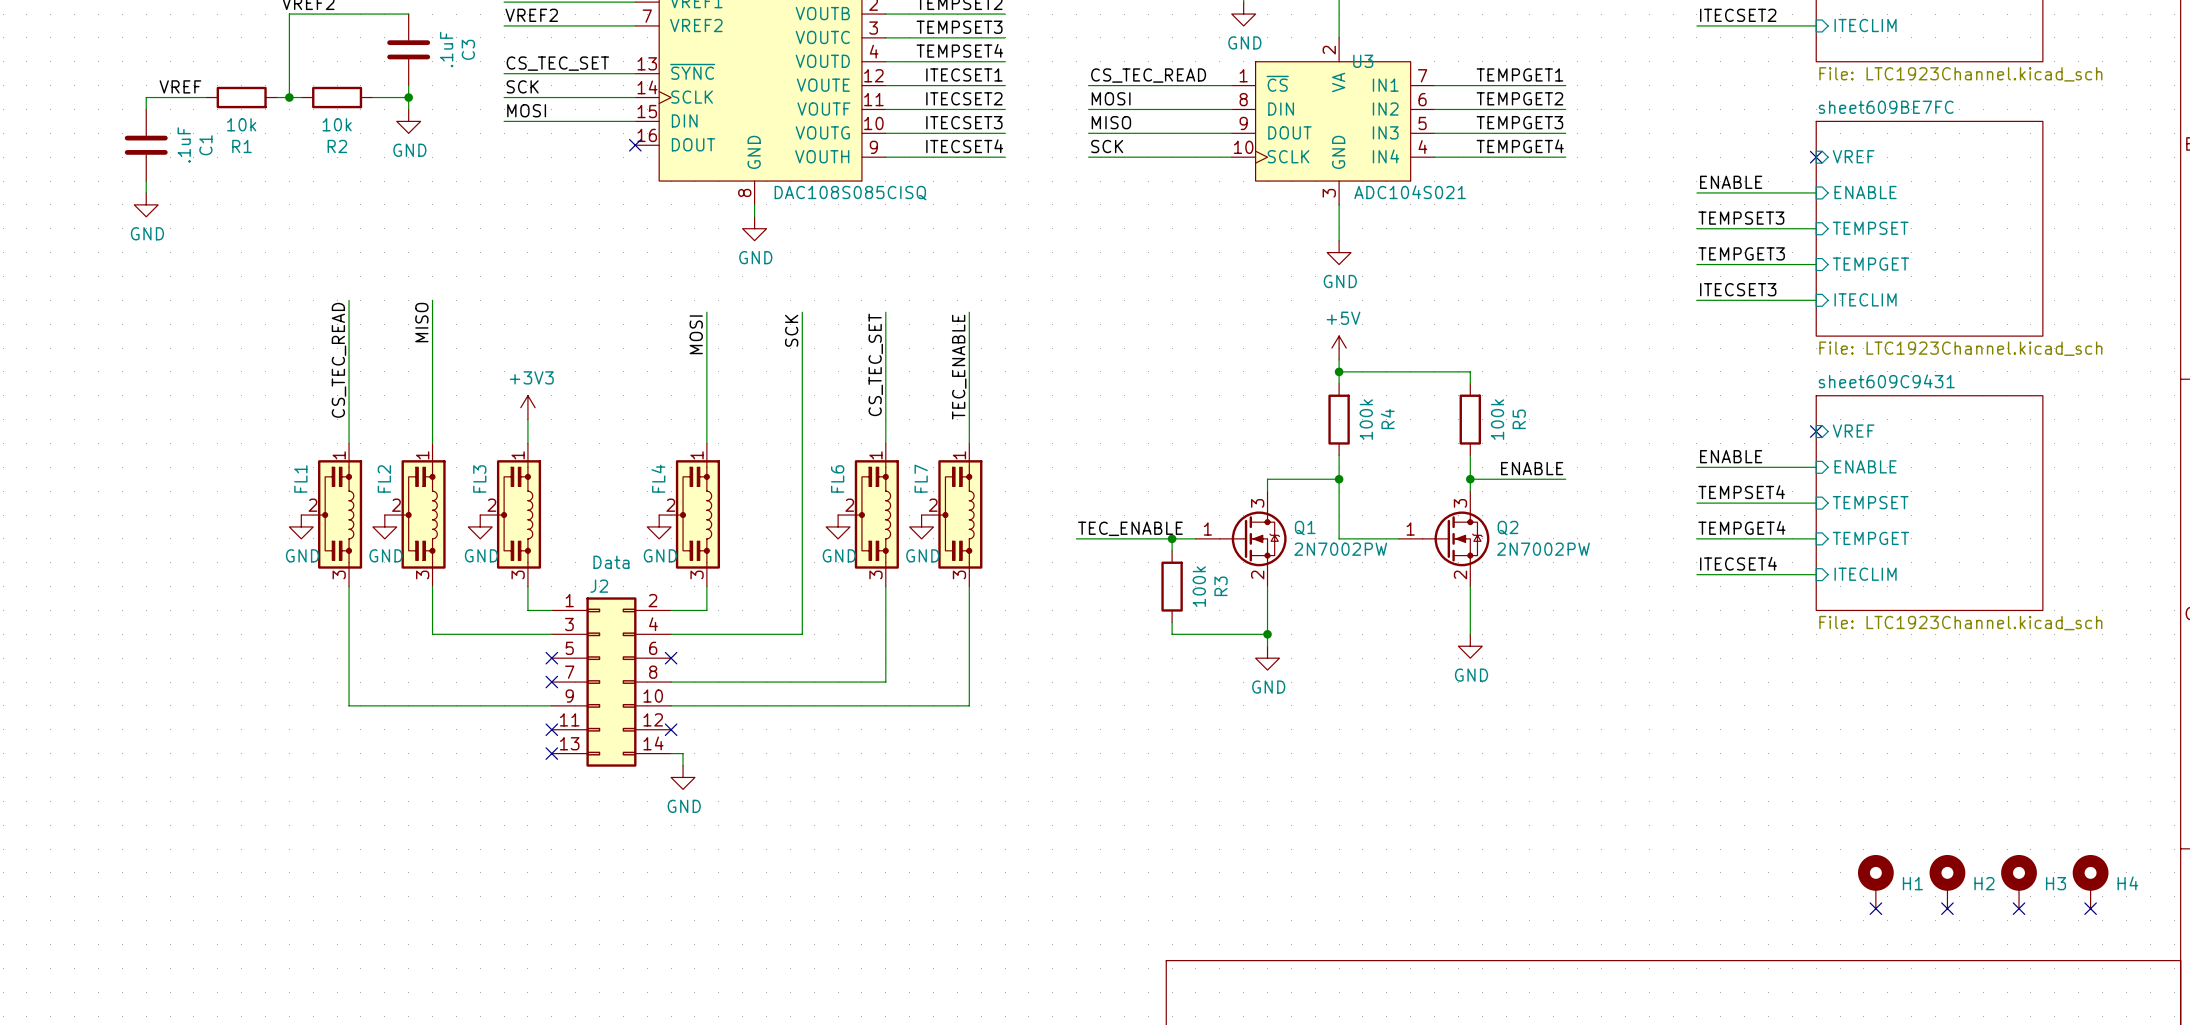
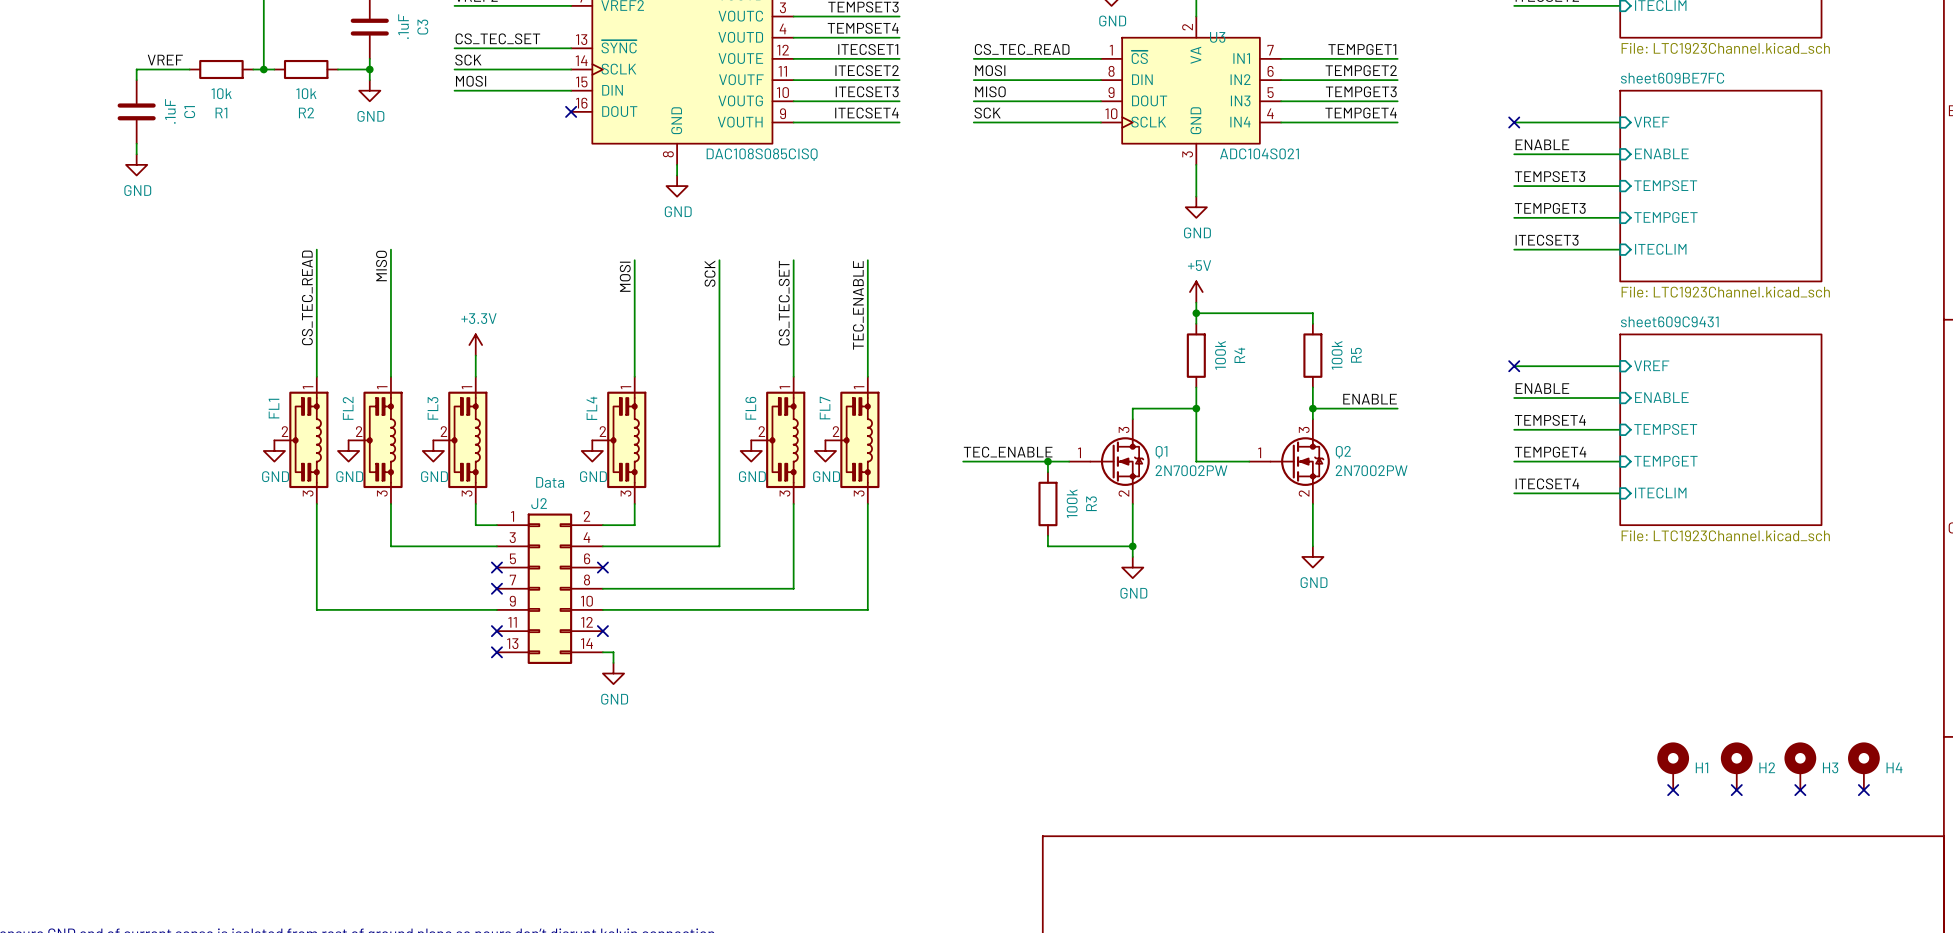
wire: none -> (1514, 122) (1620, 122)
no-connect mark: none -> (1514, 122)
no-connect mark: (1816, 157) -> none
power symbol: +3V3 (527, 407) -> +3.3V (475, 345)
wire: none -> (1514, 366) (1620, 366)
no-connect mark: none -> (1514, 366)
no-connect mark: (1816, 431) -> none

